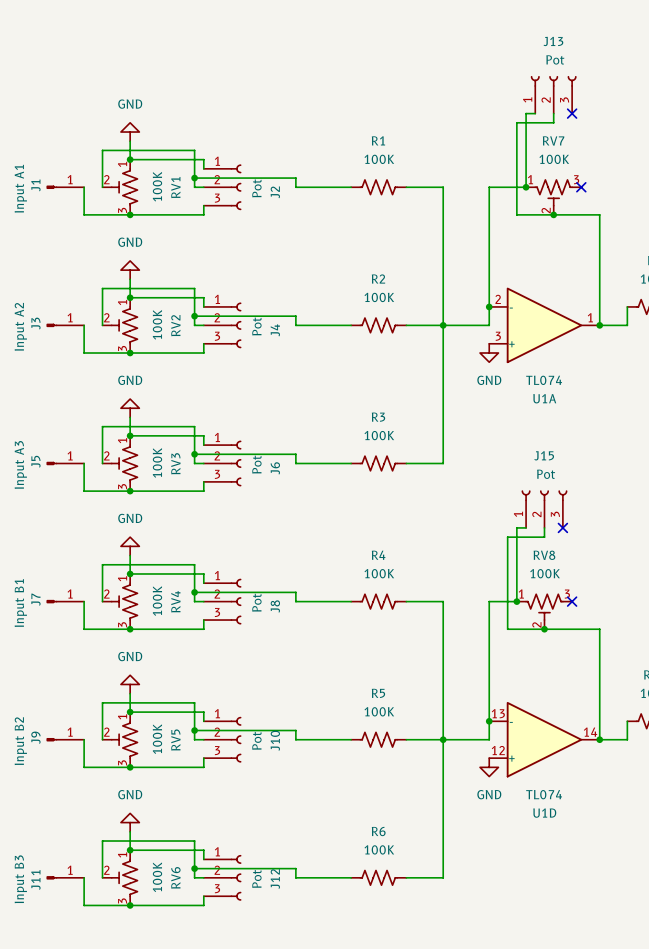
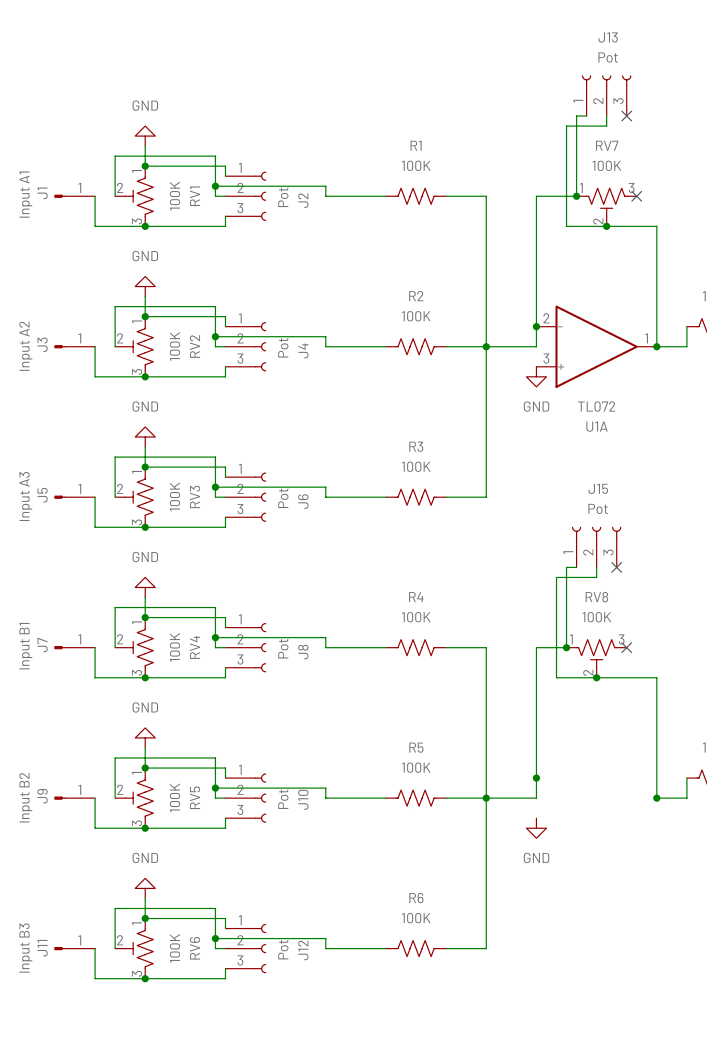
U1A value: TL074 (544, 380) -> TL072 (596, 406)
U1D: TL074 (544, 739) -> none

